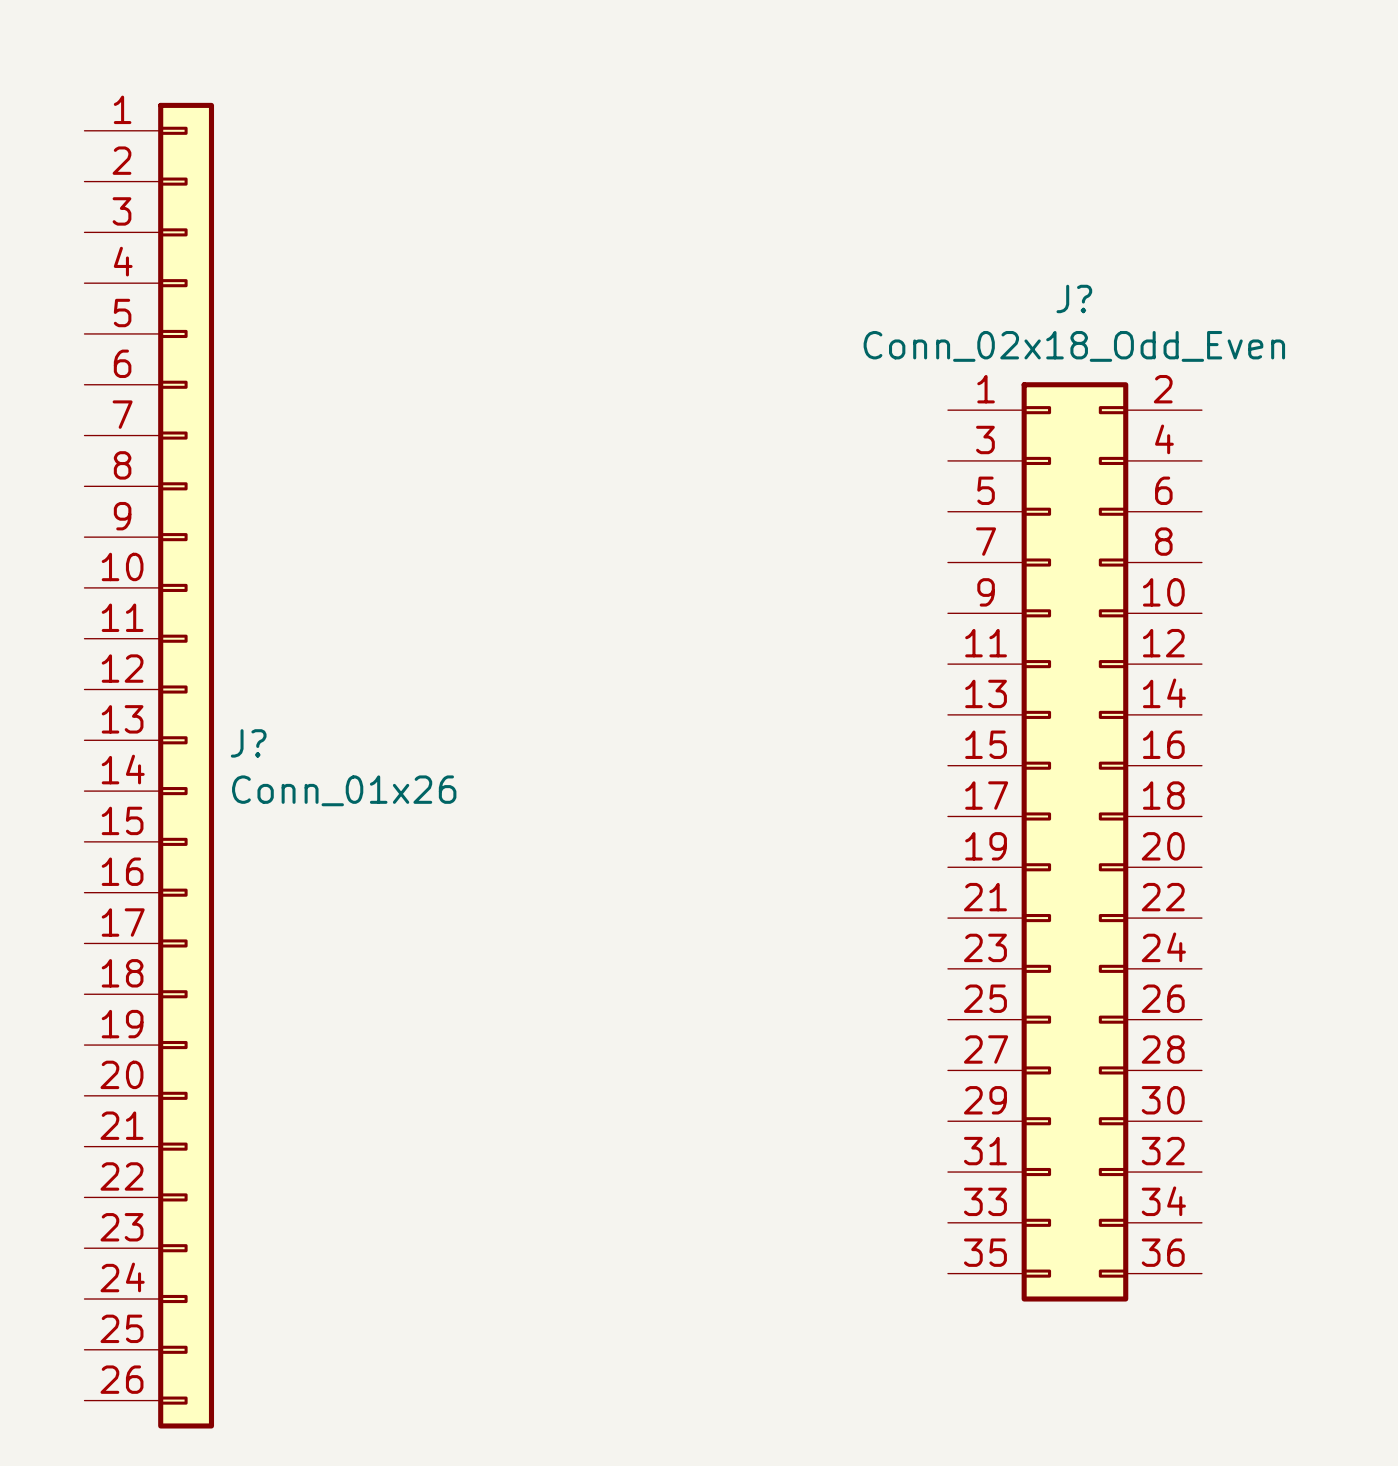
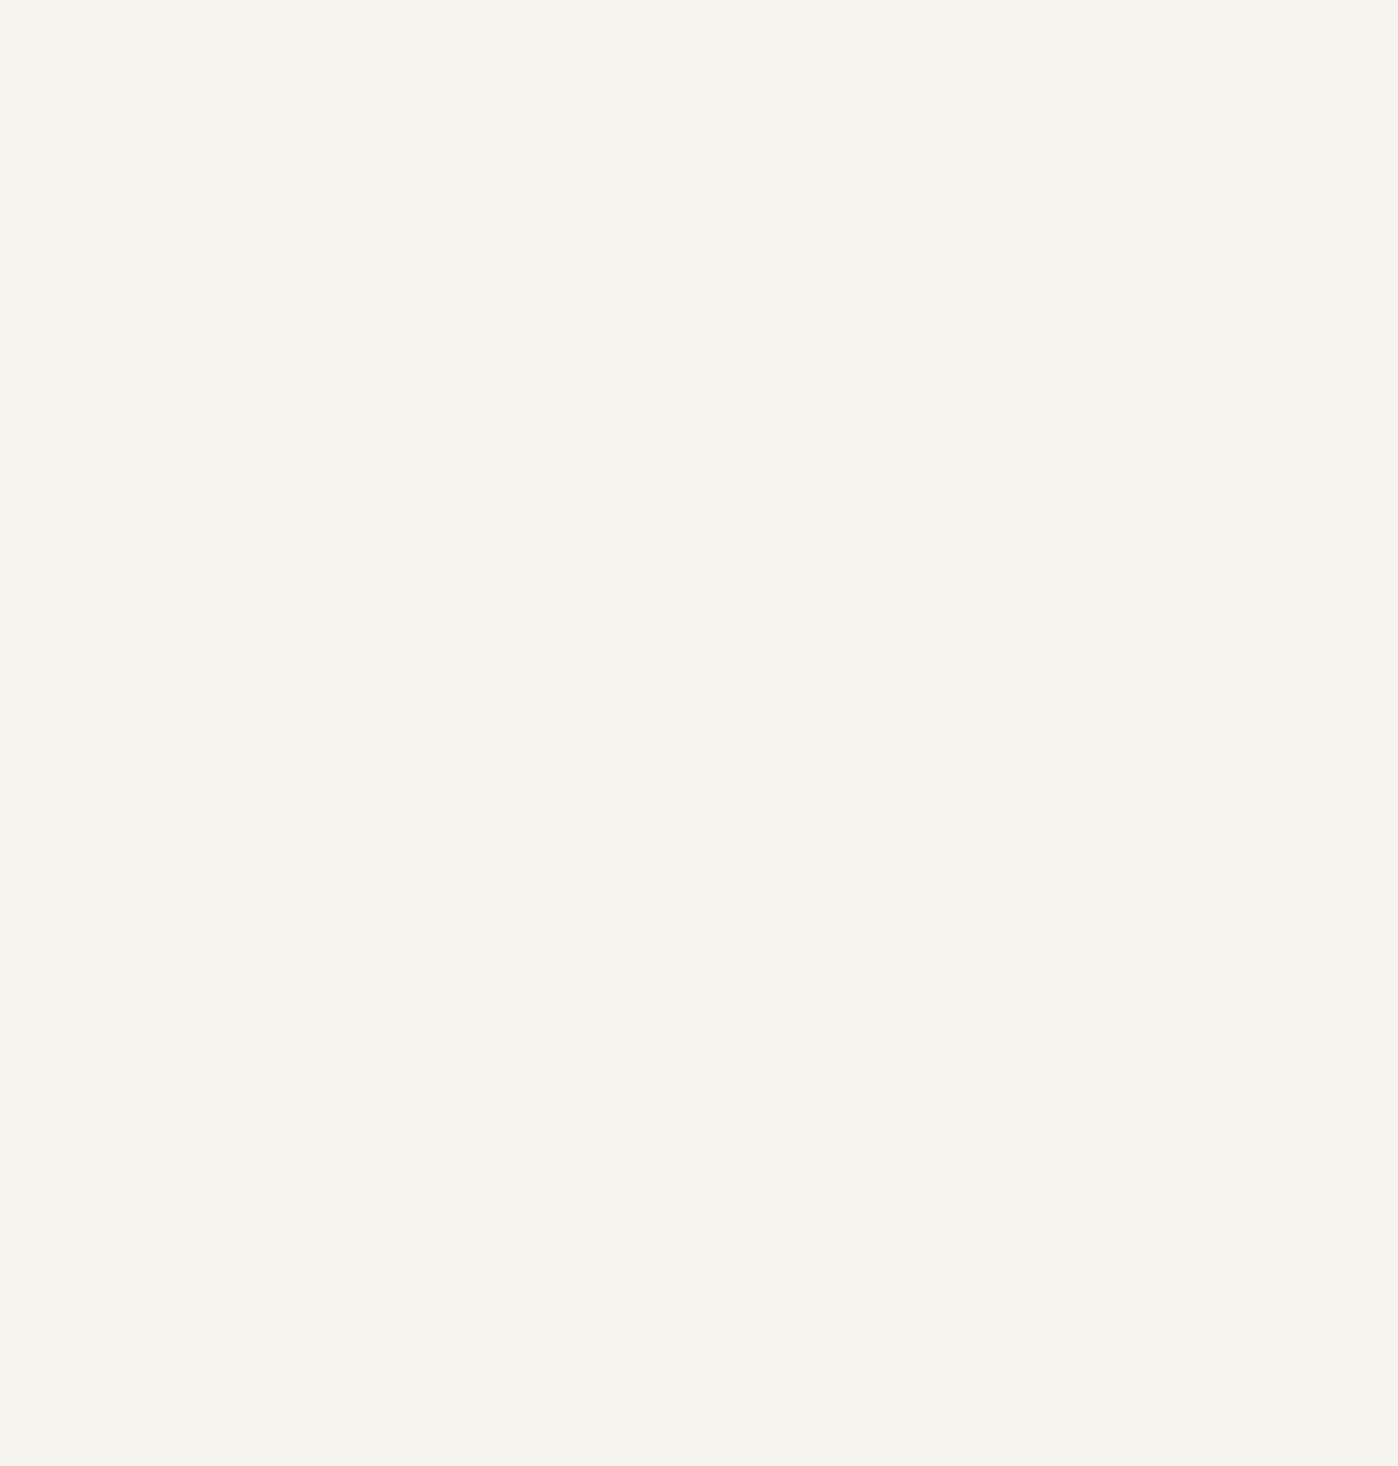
J?: Conn_01x26 (149, 765) -> none
J?: Conn_02x18_Odd_Even (1074, 841) -> none

